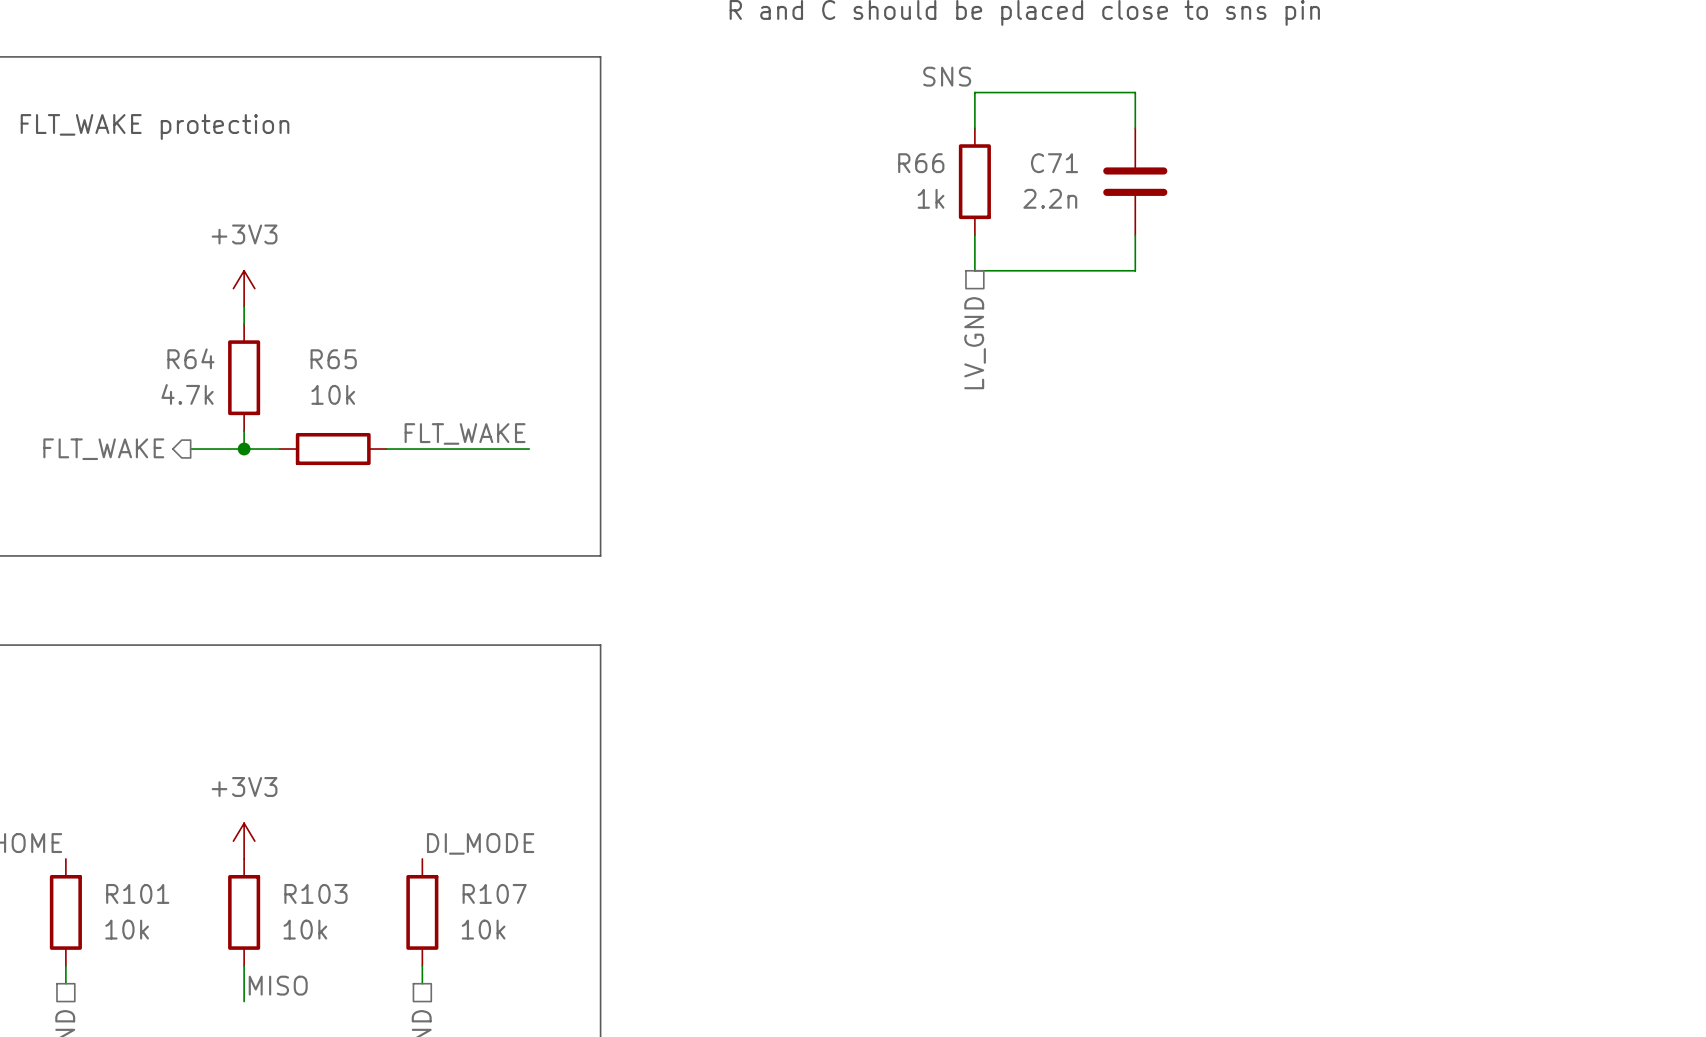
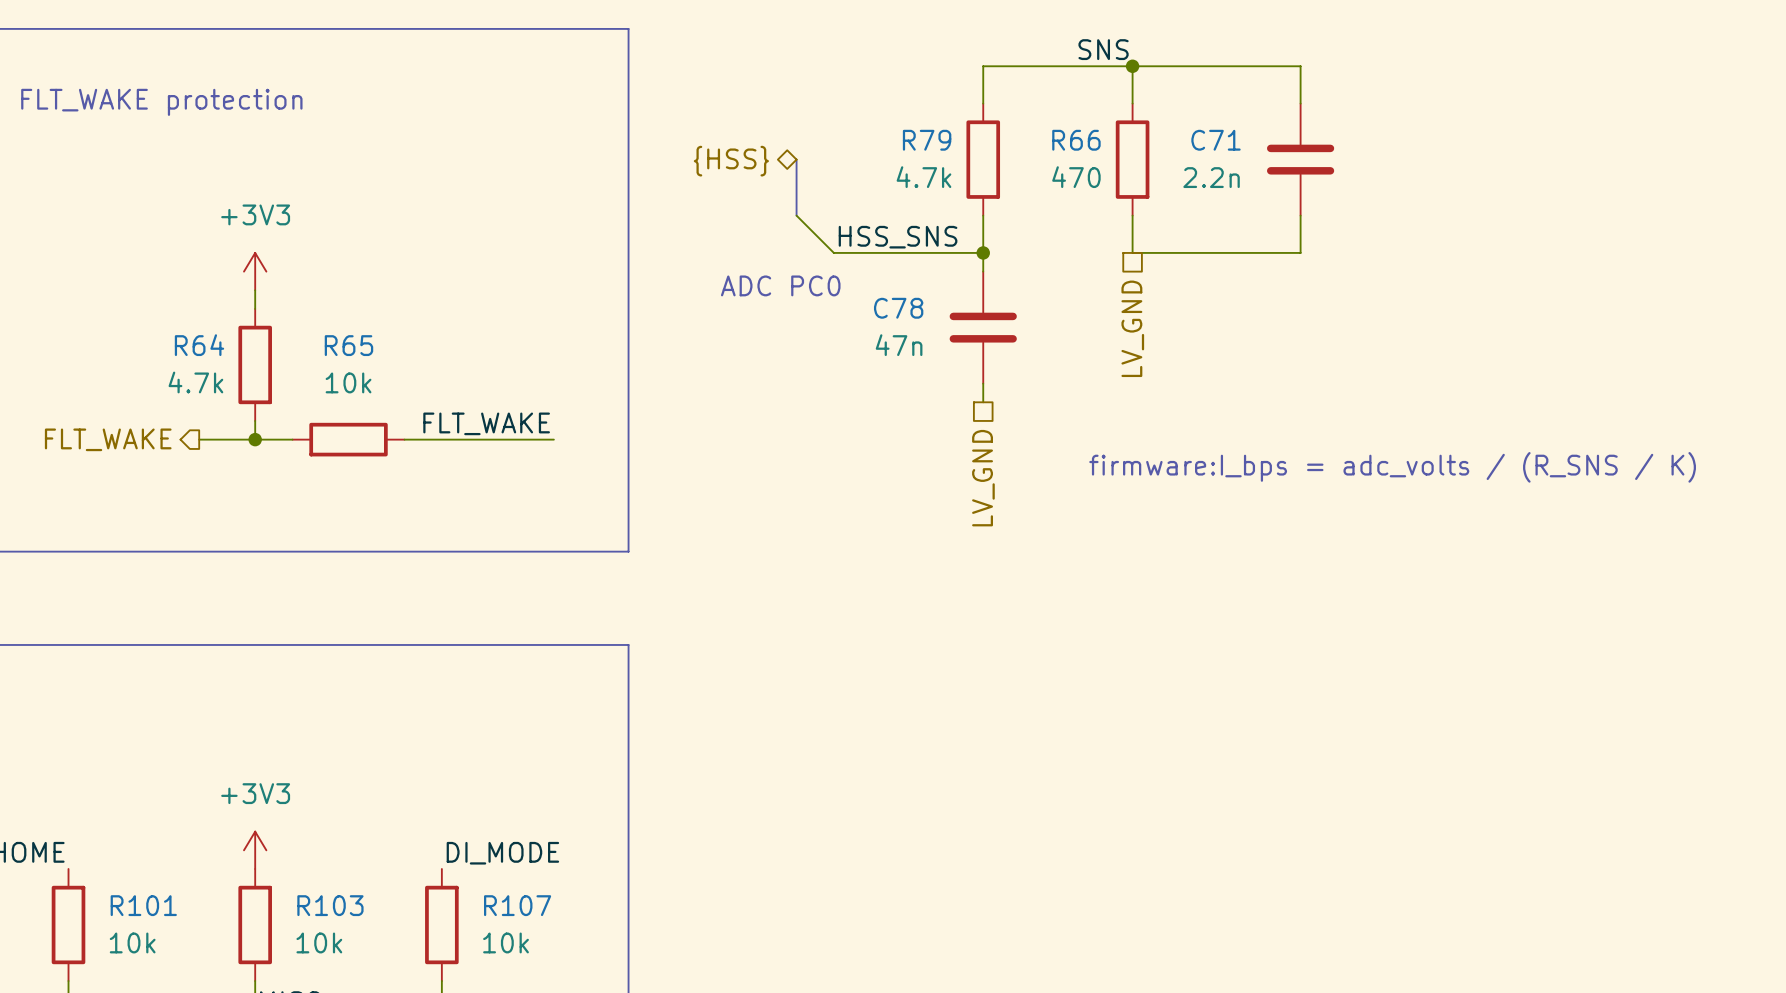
label position: SNS (947, 76) -> SNS (1103, 49)
wire: (974, 92) (974, 128) -> (1020, 66) (983, 66) (983, 103)
wire: none -> (1132, 66) (1132, 103)
junction: none -> (1132, 66)
wire: (1135, 92) (1135, 128) -> (1188, 66) (1300, 66) (1300, 103)
bus: none -> (796, 159) (796, 215)
R79: none -> 4.7k (983, 159)
R66 position: (974, 181) -> (1132, 159)
C71 position: (1135, 181) -> (1300, 159)
hierarchical label: none -> {HSS} (731, 161)
R66 value: 1k (931, 198) -> 470 (1076, 177)
wire: none -> (796, 215) (833, 252) (983, 252)
wire: none -> (983, 215) (983, 271)
wire: (974, 235) (974, 270) (1081, 270) -> (1132, 215) (1132, 252)
wire: (1135, 235) (1135, 270) -> (1300, 215) (1300, 252) (1188, 252)
label: none -> HSS_SNS (898, 237)
junction: none -> (983, 252)
text: none -> ADC PC0 (780, 285)
C78: none -> 47n (983, 327)
hierarchical label: LV_GND (975, 343) -> none
hierarchical label: none -> LV_GND (1132, 328)
wire: none -> (983, 383) (983, 402)
text: none -> firmware:I_bps = adc_volts / (R_SNS / K) (1392, 467)
hierarchical label: none -> LV_GND (983, 478)

